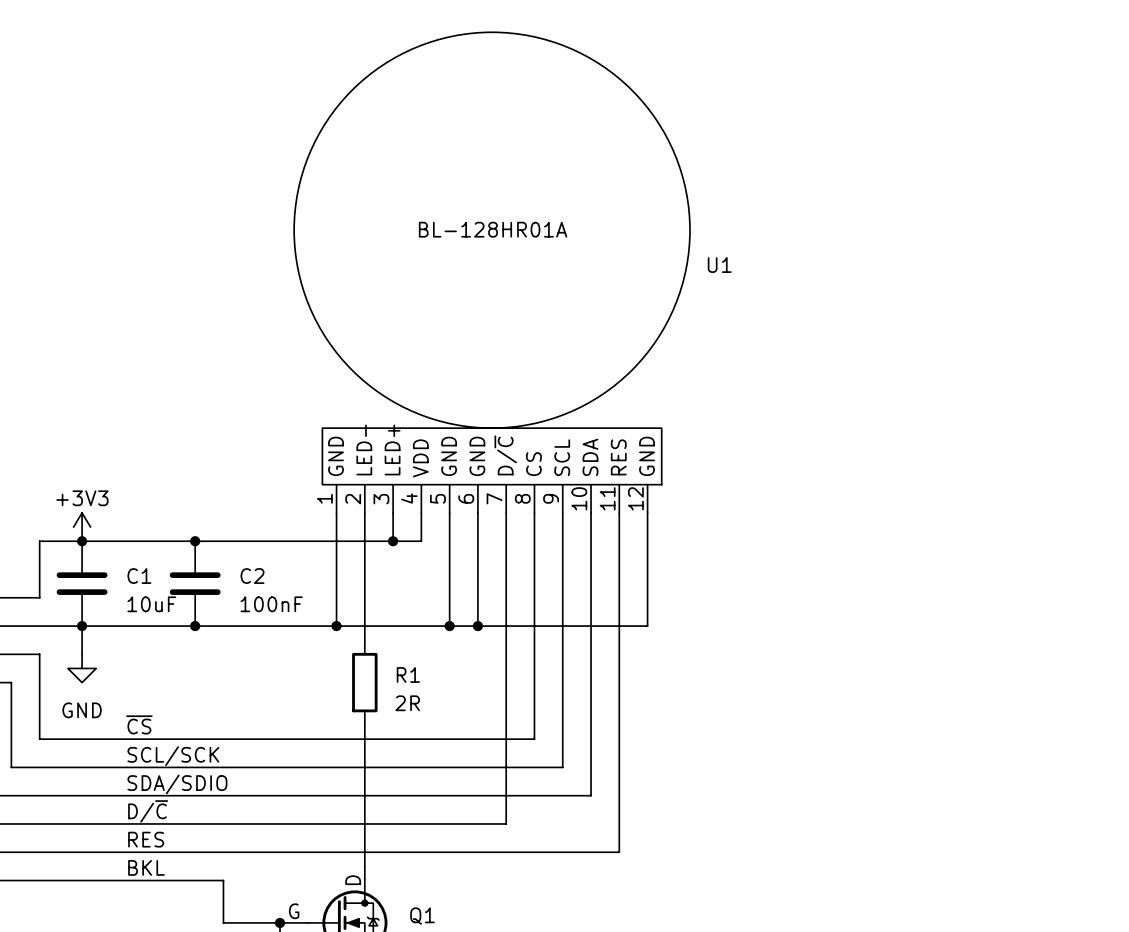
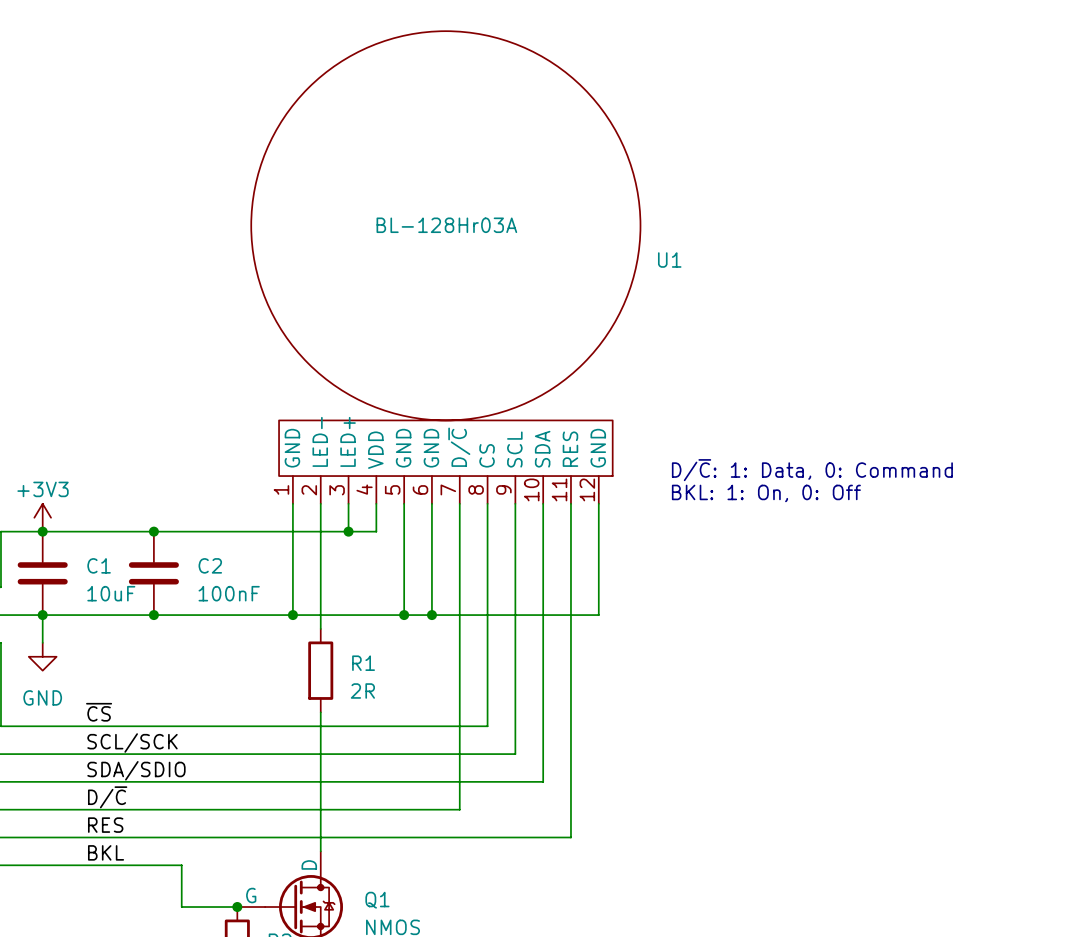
U1 value: BL-128HR01A (493, 229) -> BL-128Hr03A (446, 225)
text: none -> D/~{C}: 1: Data, 0: Command (812, 470)
text: none -> BKL: 1: On, 0: Off (766, 493)

